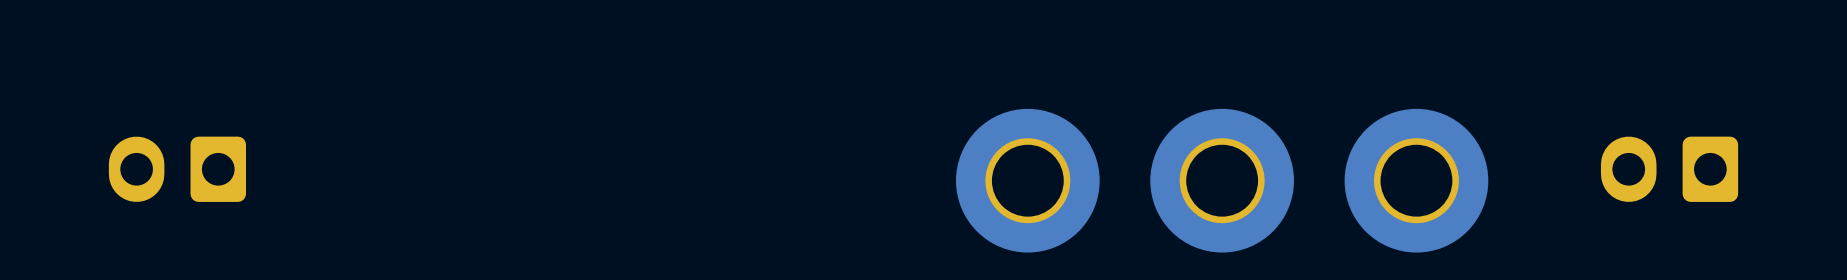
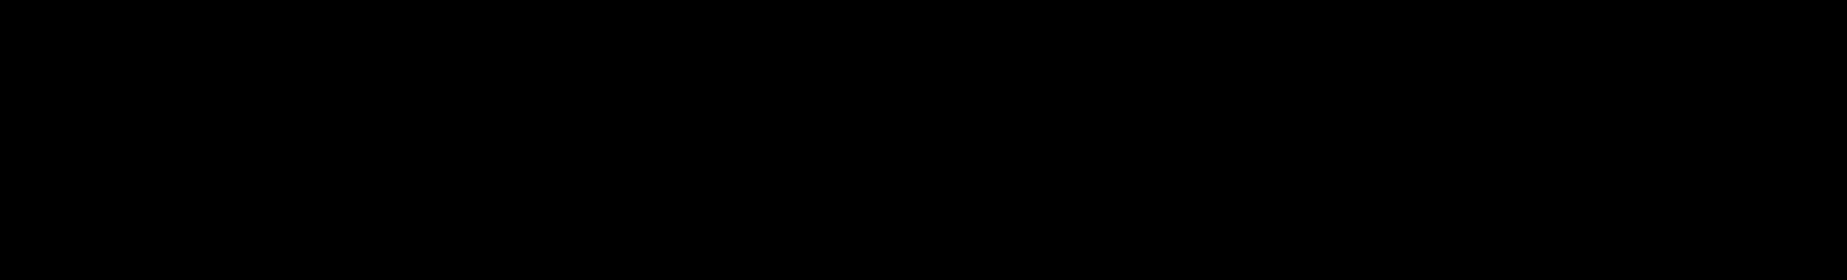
part: (177, 169) -> none
part: (1669, 169) -> none
part: (1027, 180) -> none
part: (1222, 180) -> none
part: (1416, 180) -> none

